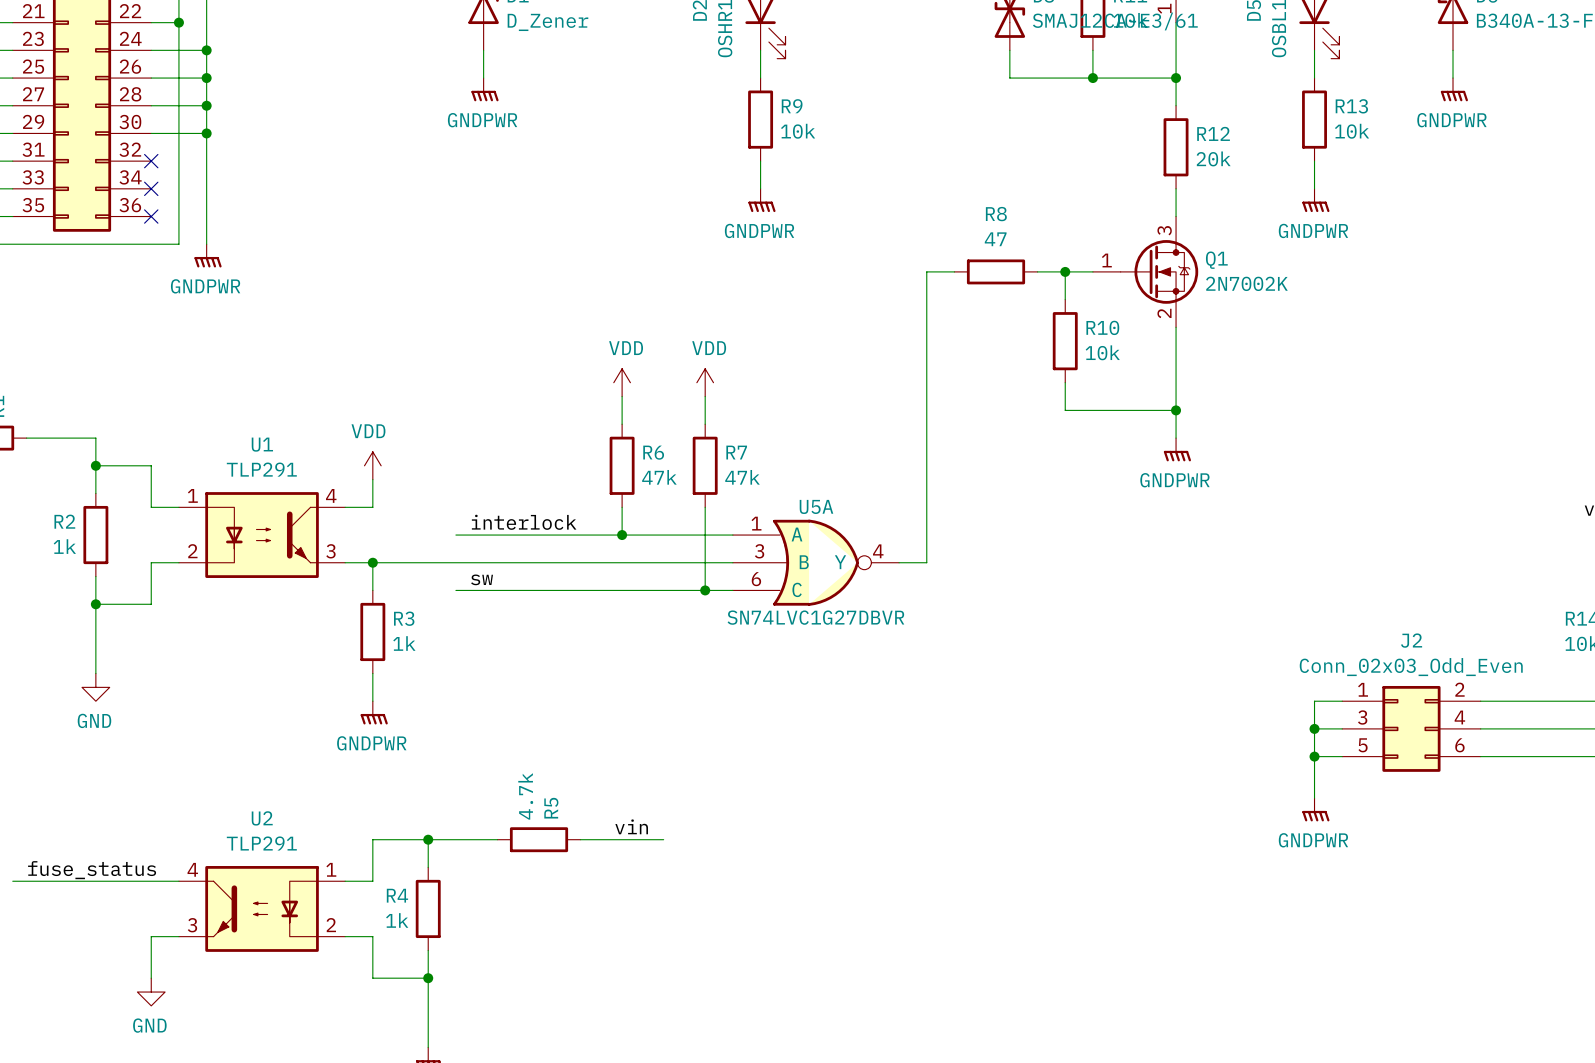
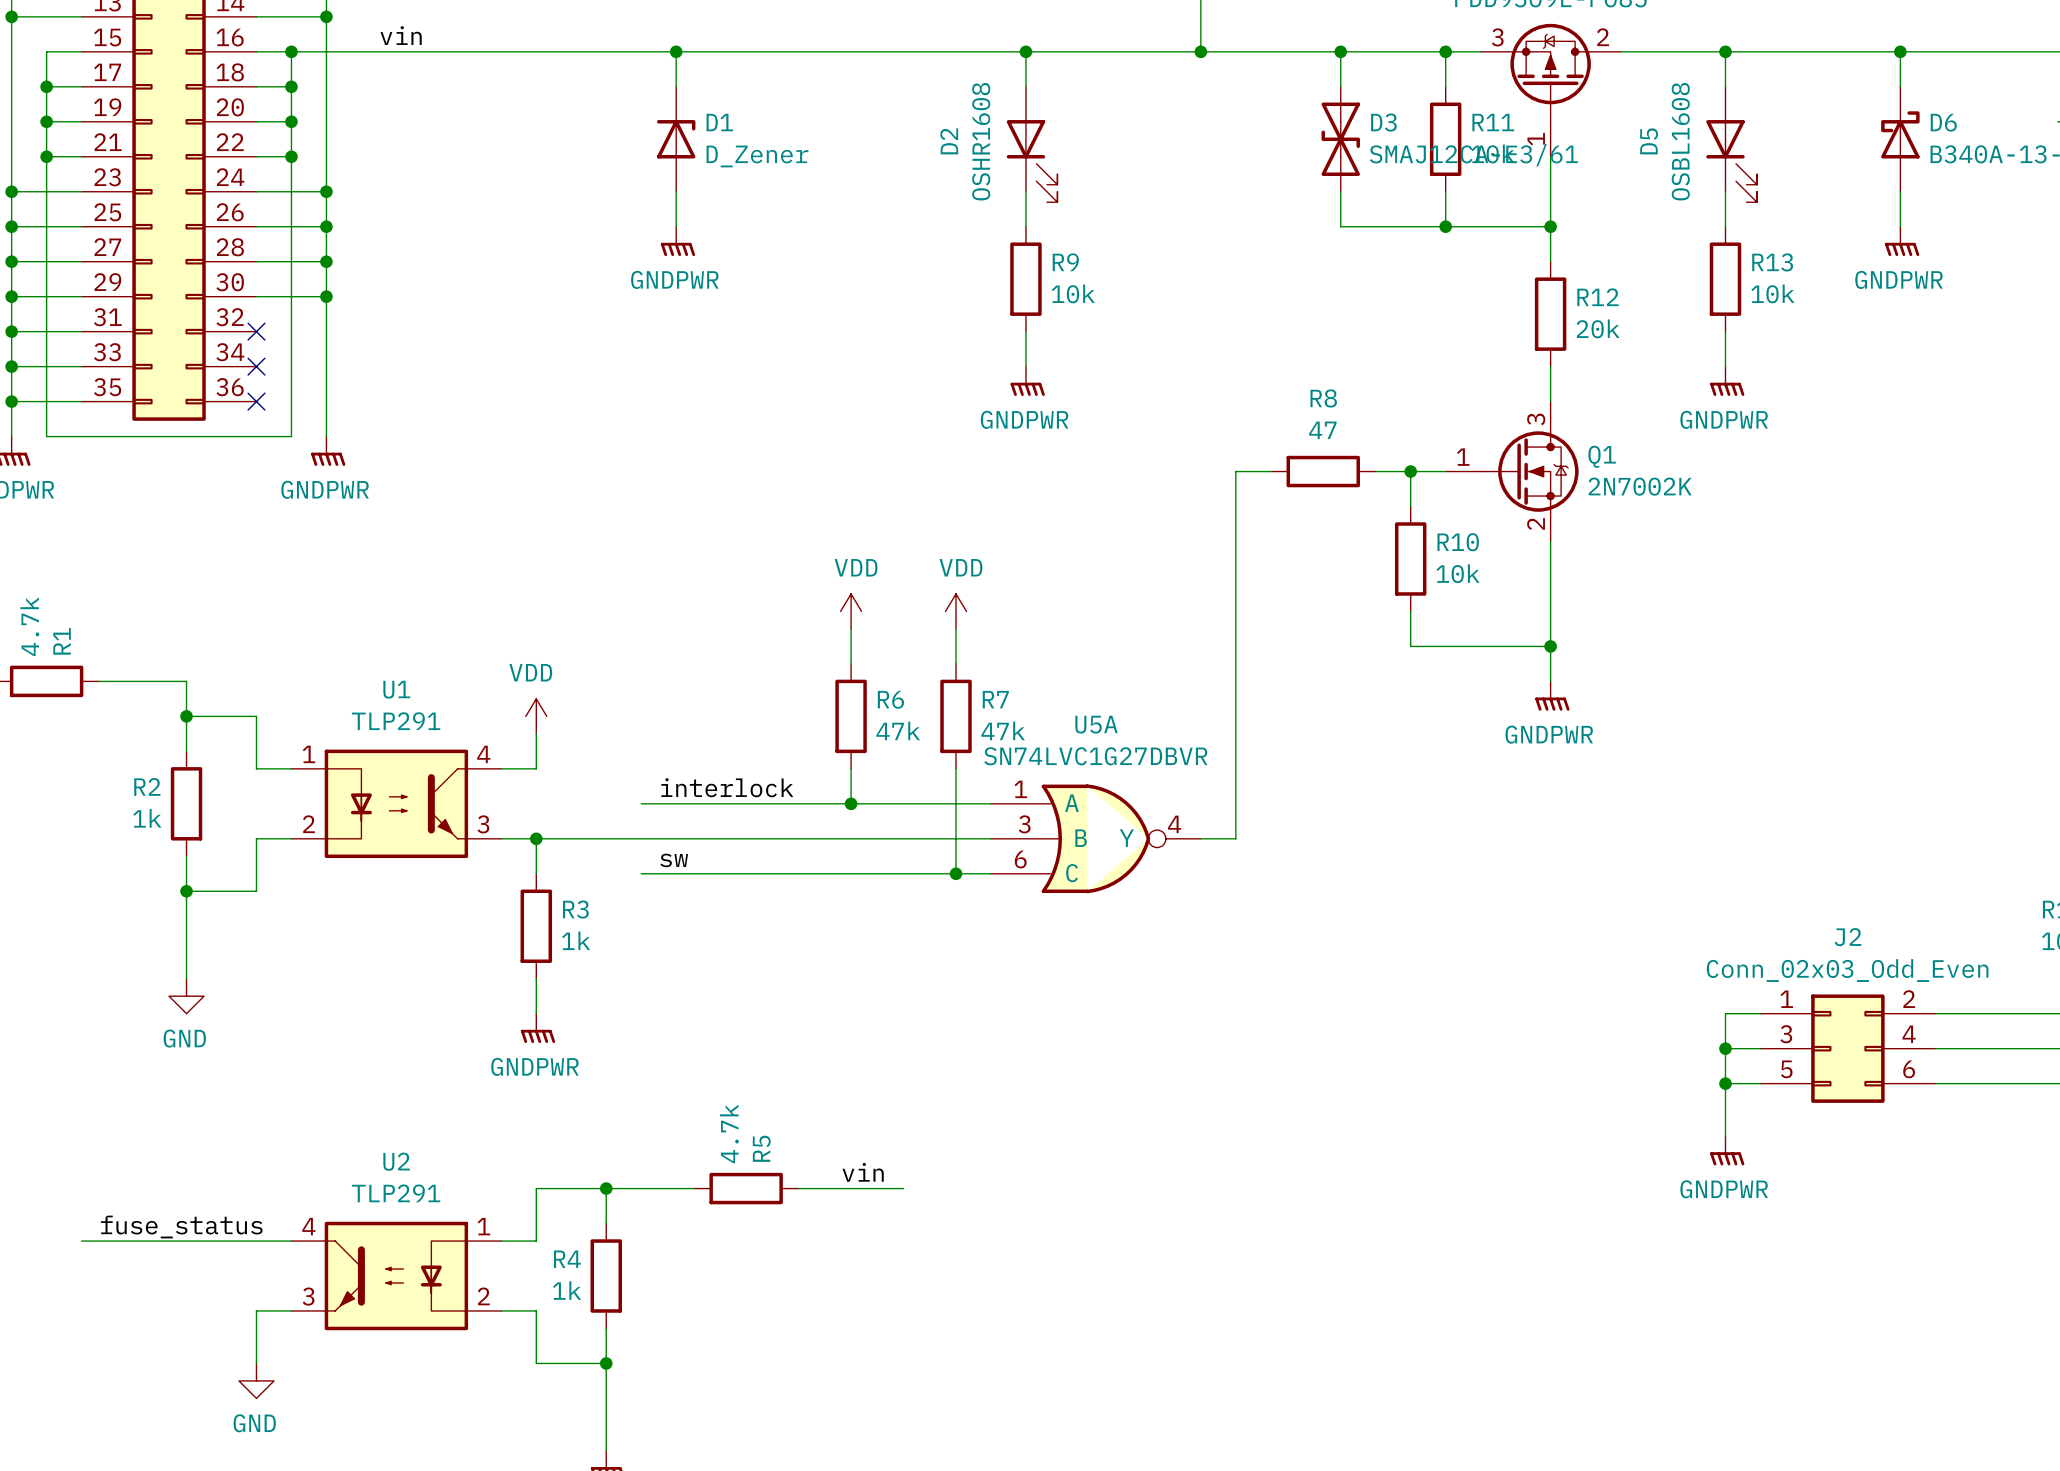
U5A name position: U5A (816, 506) -> U5A (1096, 724)
U5A value position: SN74LVC1G27DBVR (815, 617) -> SN74LVC1G27DBVR (1095, 756)

